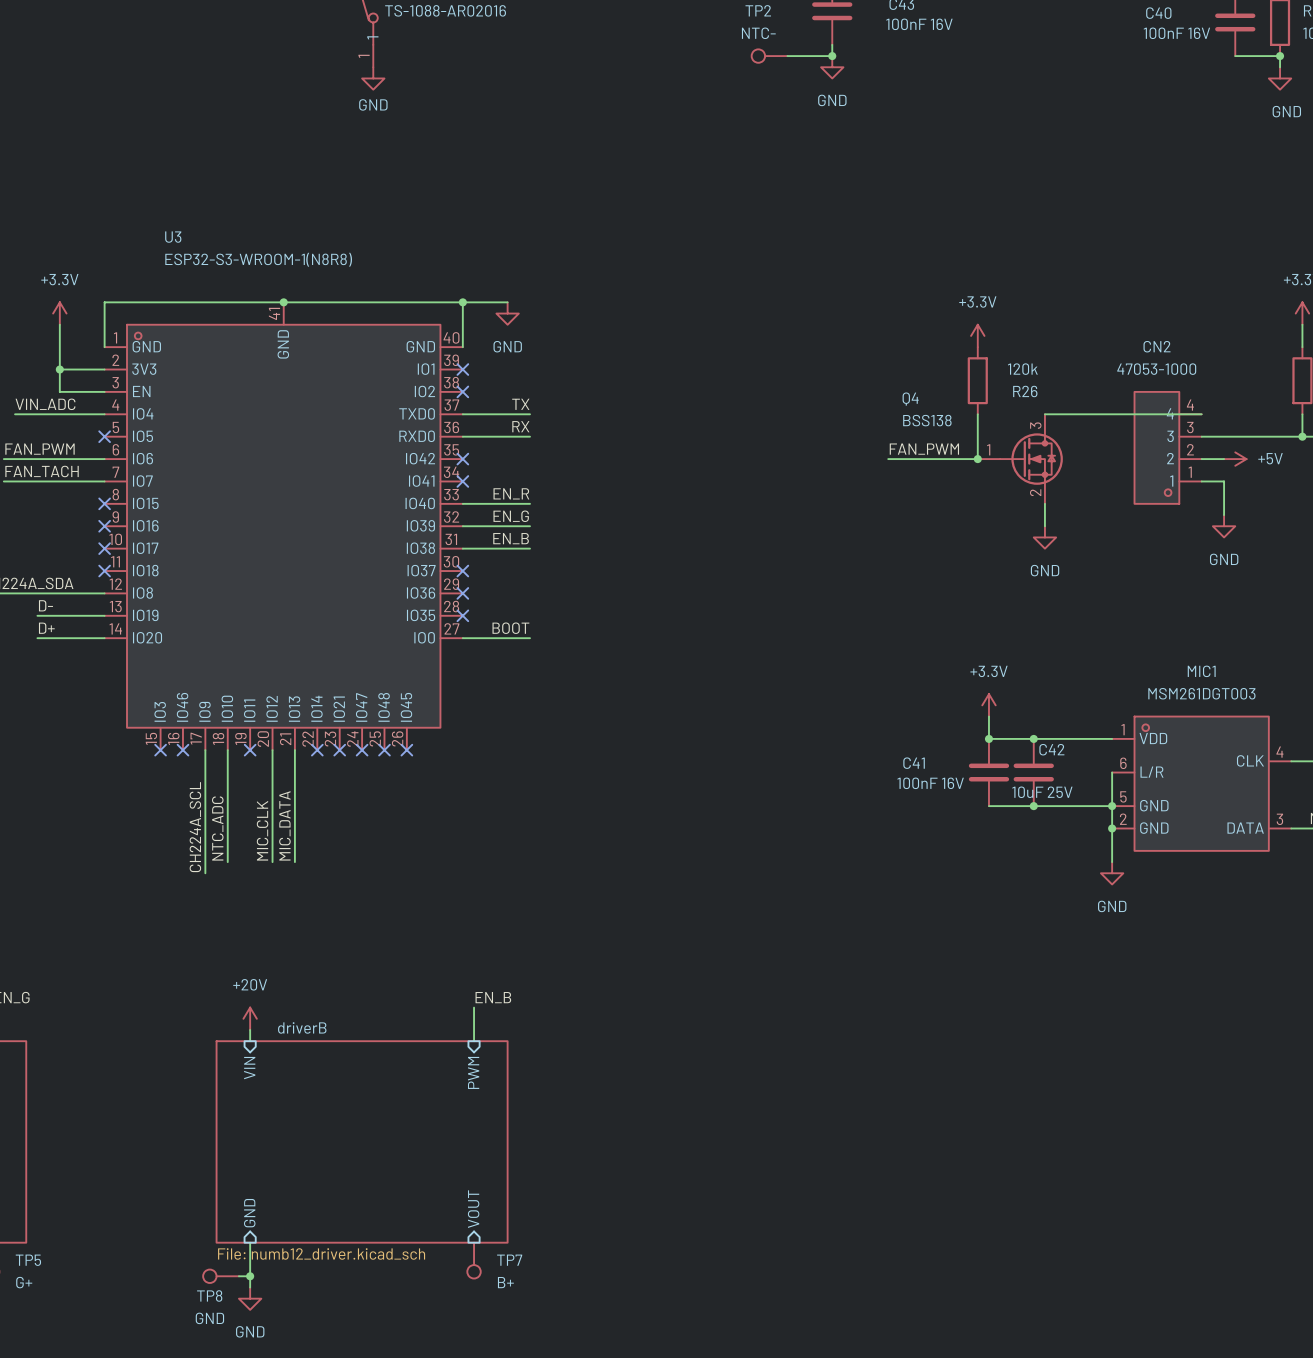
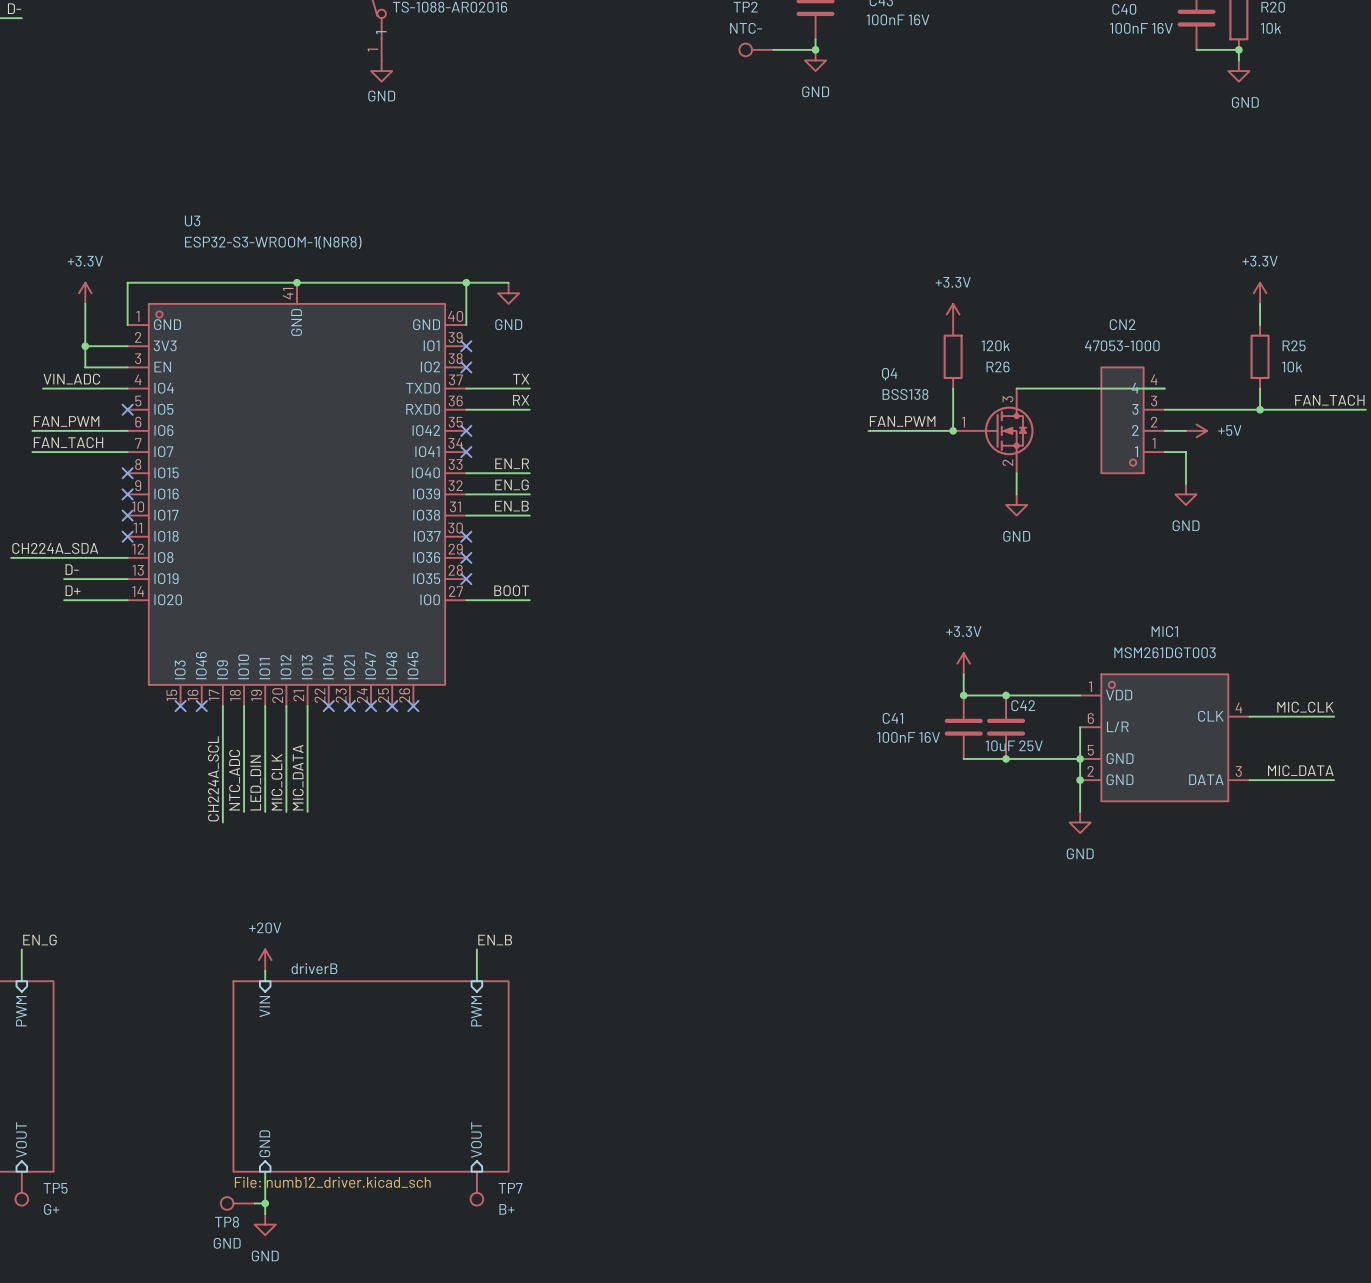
wire: none -> (265, 706) (265, 811)
no-connect mark: (250, 750) -> none
label: none -> LED_DIN (255, 782)

